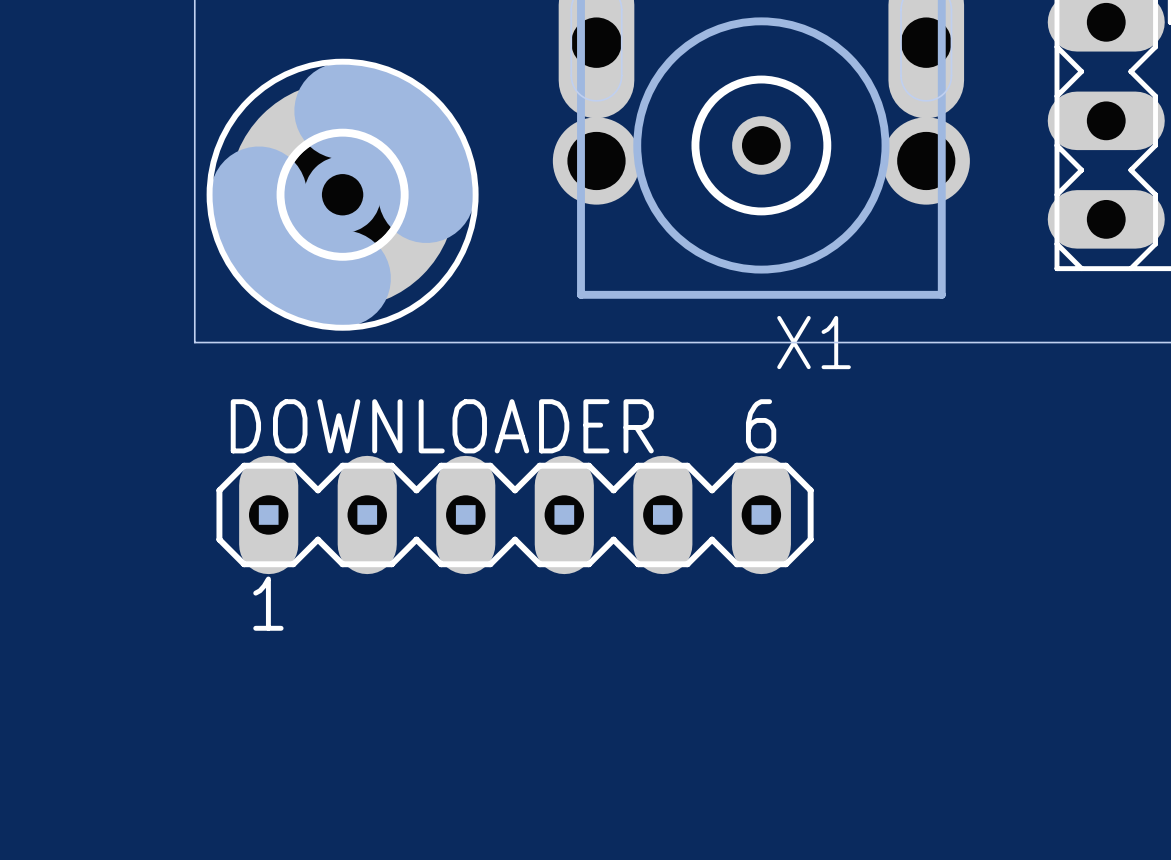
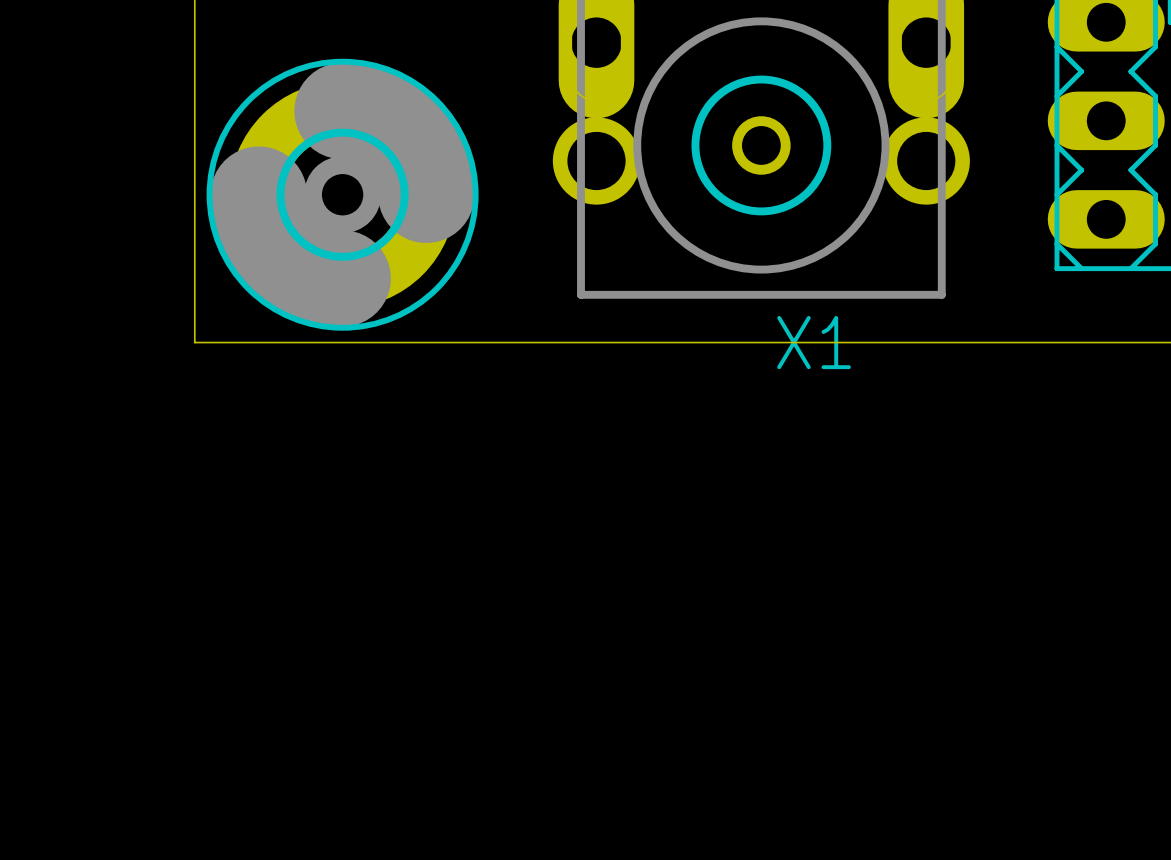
DOWNLOADER: (515, 514) -> none

